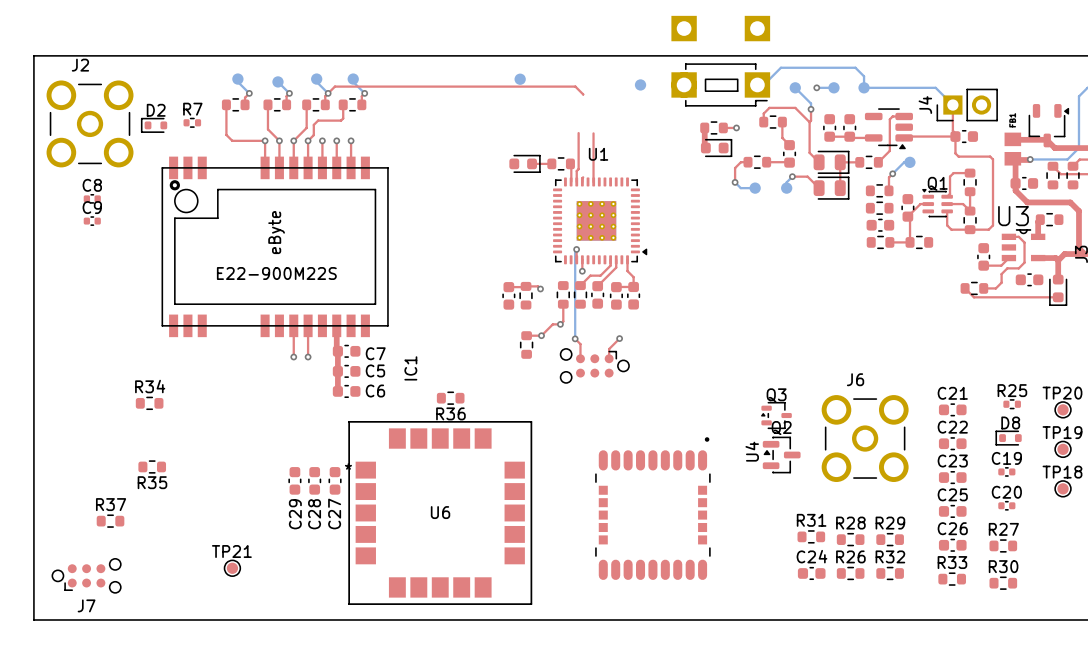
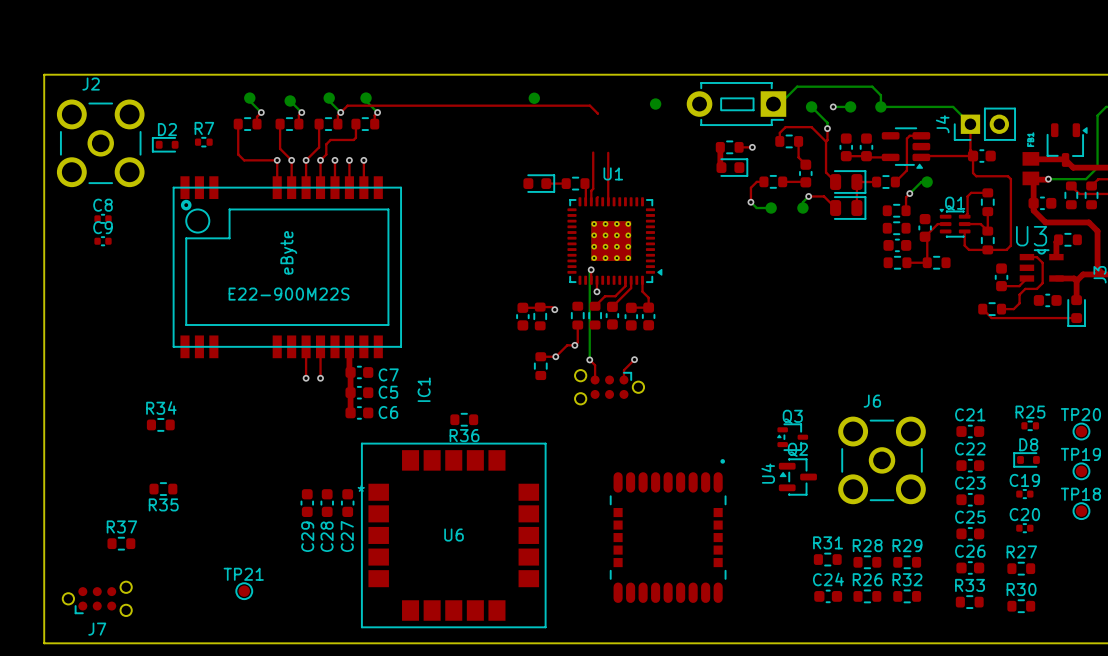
part: (720, 61) -> none
part: none -> (736, 104)

